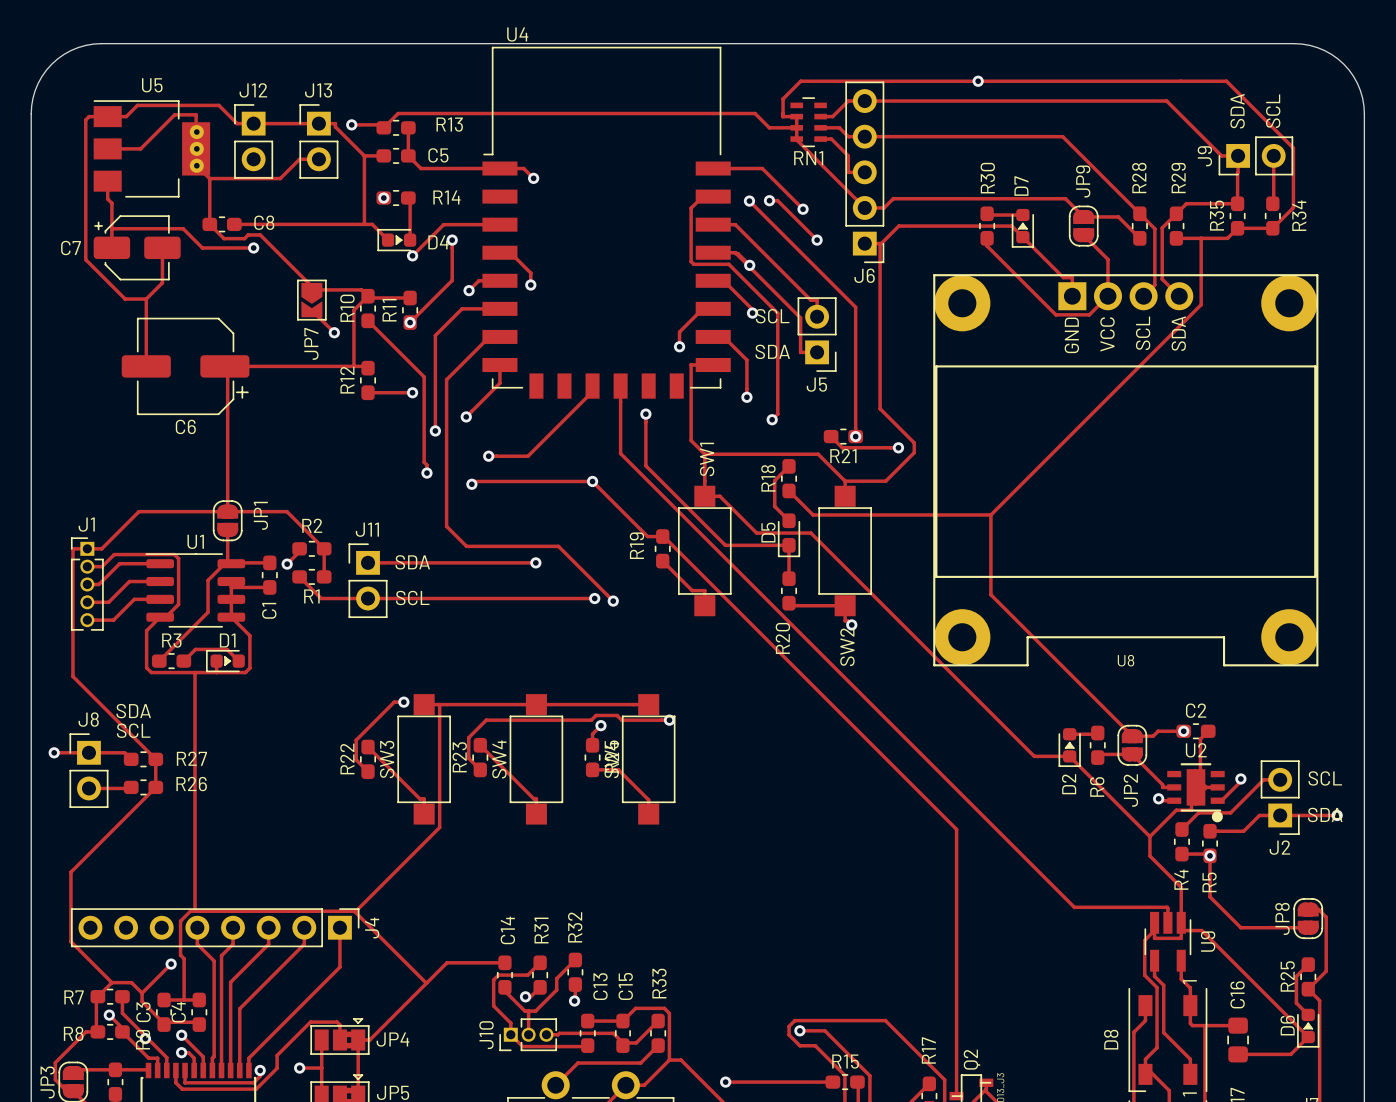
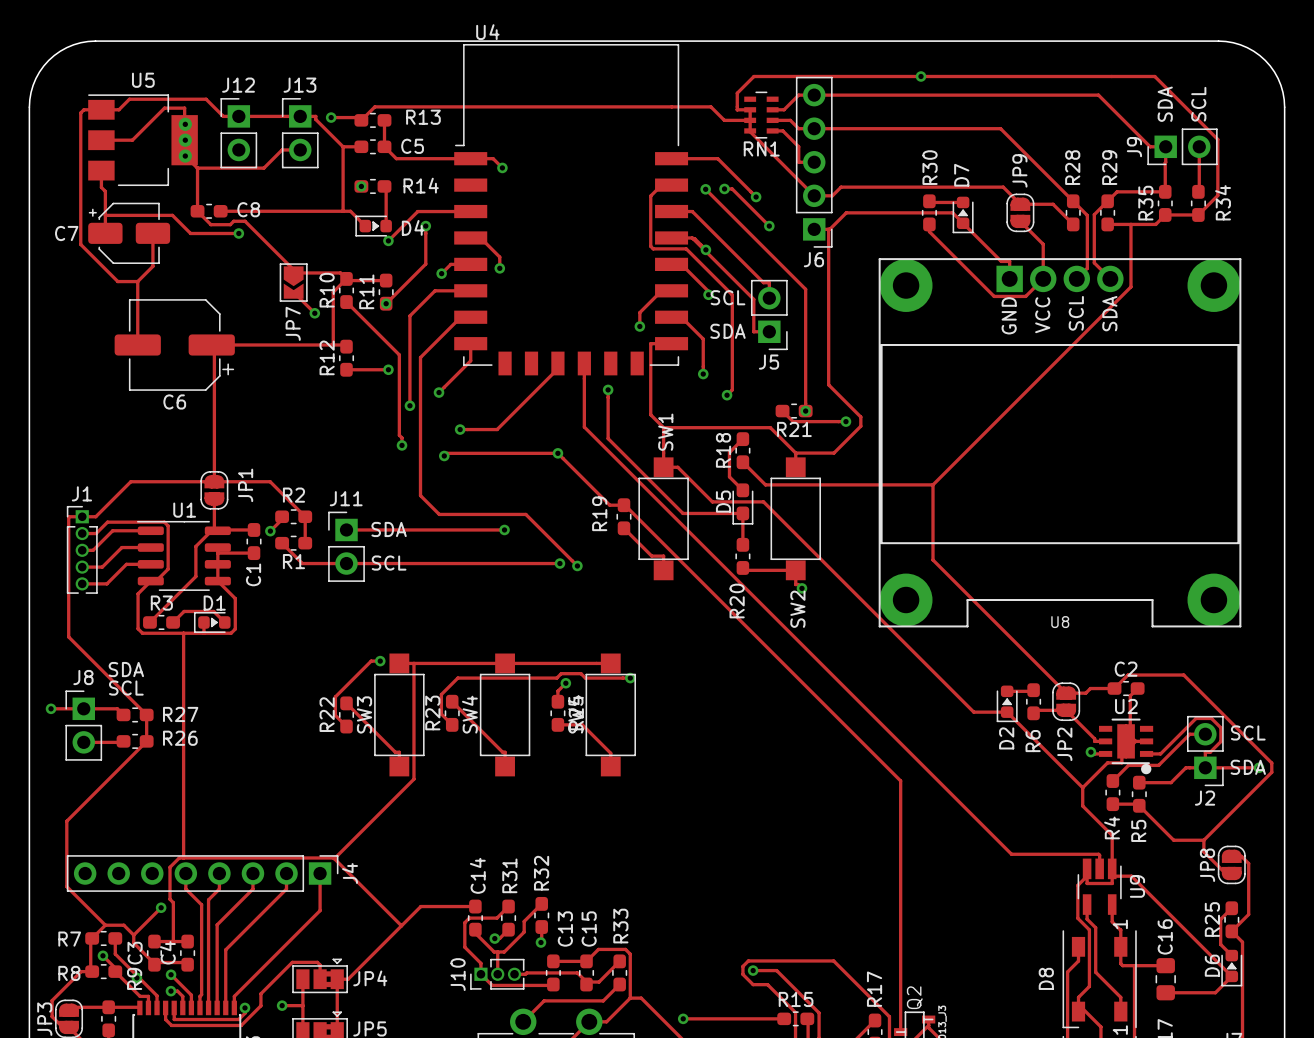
track: none -> (1114, 688) (1128, 675) (1183, 675) (1271, 763) (1271, 772) (1203, 840)
via: (1183, 731) -> none
track: (1240, 778) (1240, 781) (1221, 800) -> (1205, 767) (1205, 752) (1210, 752) (1220, 741) (1220, 727) (1211, 718) (1196, 718) (1160, 753) (1150, 753)
via: (1240, 778) -> none
track: (1210, 855) (1210, 896) (1240, 927) (1301, 927) -> (1139, 805) (1173, 840) (1203, 840)
via: (1210, 855) -> none
track: none -> (1203, 840) (1203, 851) (1225, 873)

